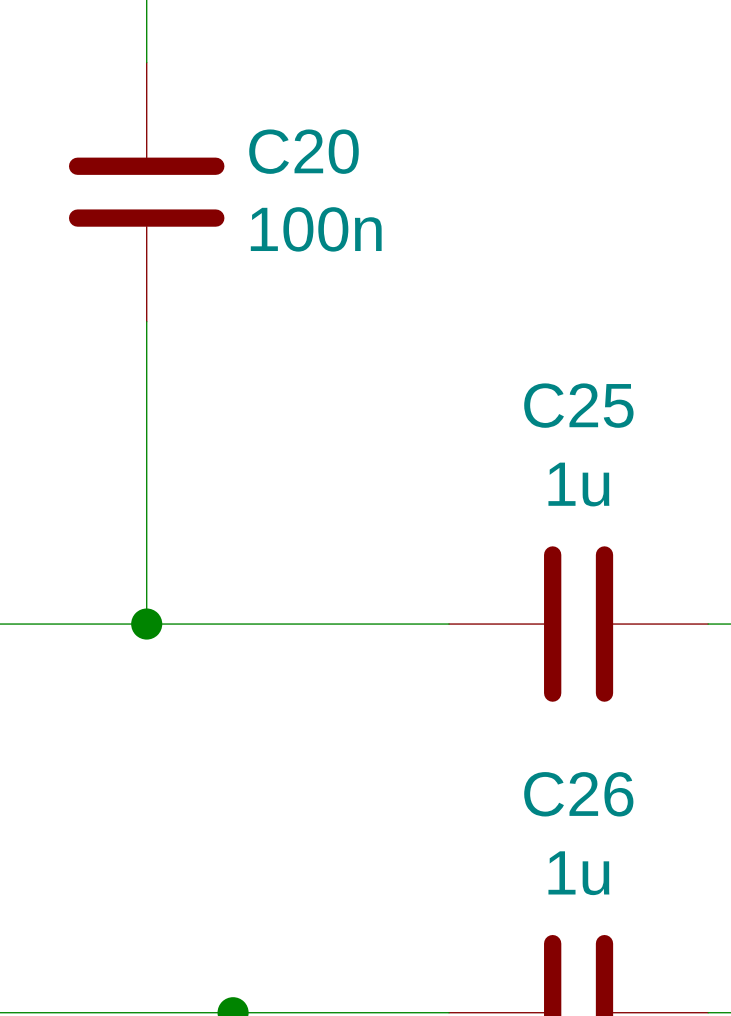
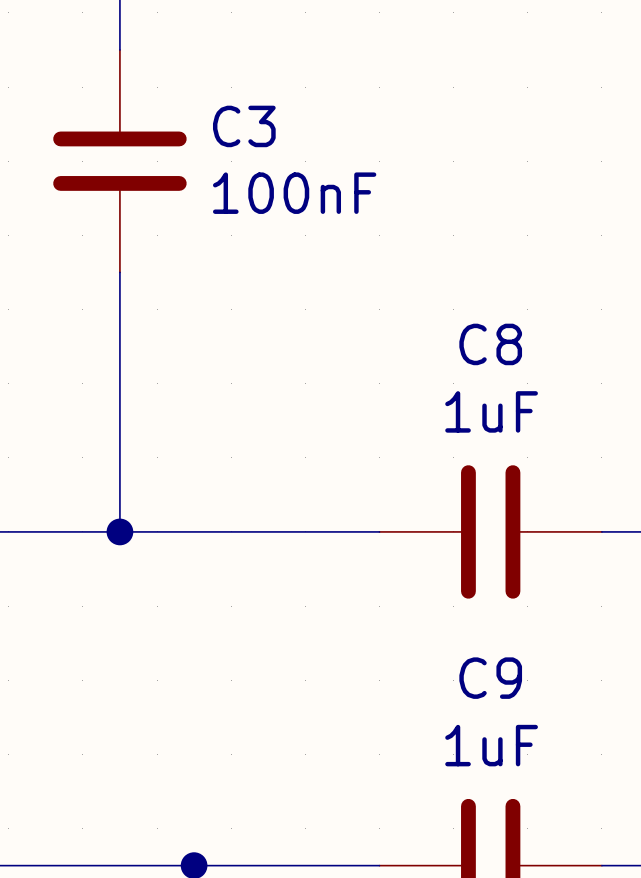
C20 name: C20 (303, 151) -> C3 (244, 126)
C20 value: 100n (316, 229) -> 100nF (294, 193)
C25 name: C25 (578, 405) -> C8 (490, 344)
C25 value: 1u (578, 484) -> 1uF (491, 411)
C26 name: C26 (578, 794) -> C9 (490, 678)
C26 value: 1u (578, 873) -> 1uF (491, 745)

